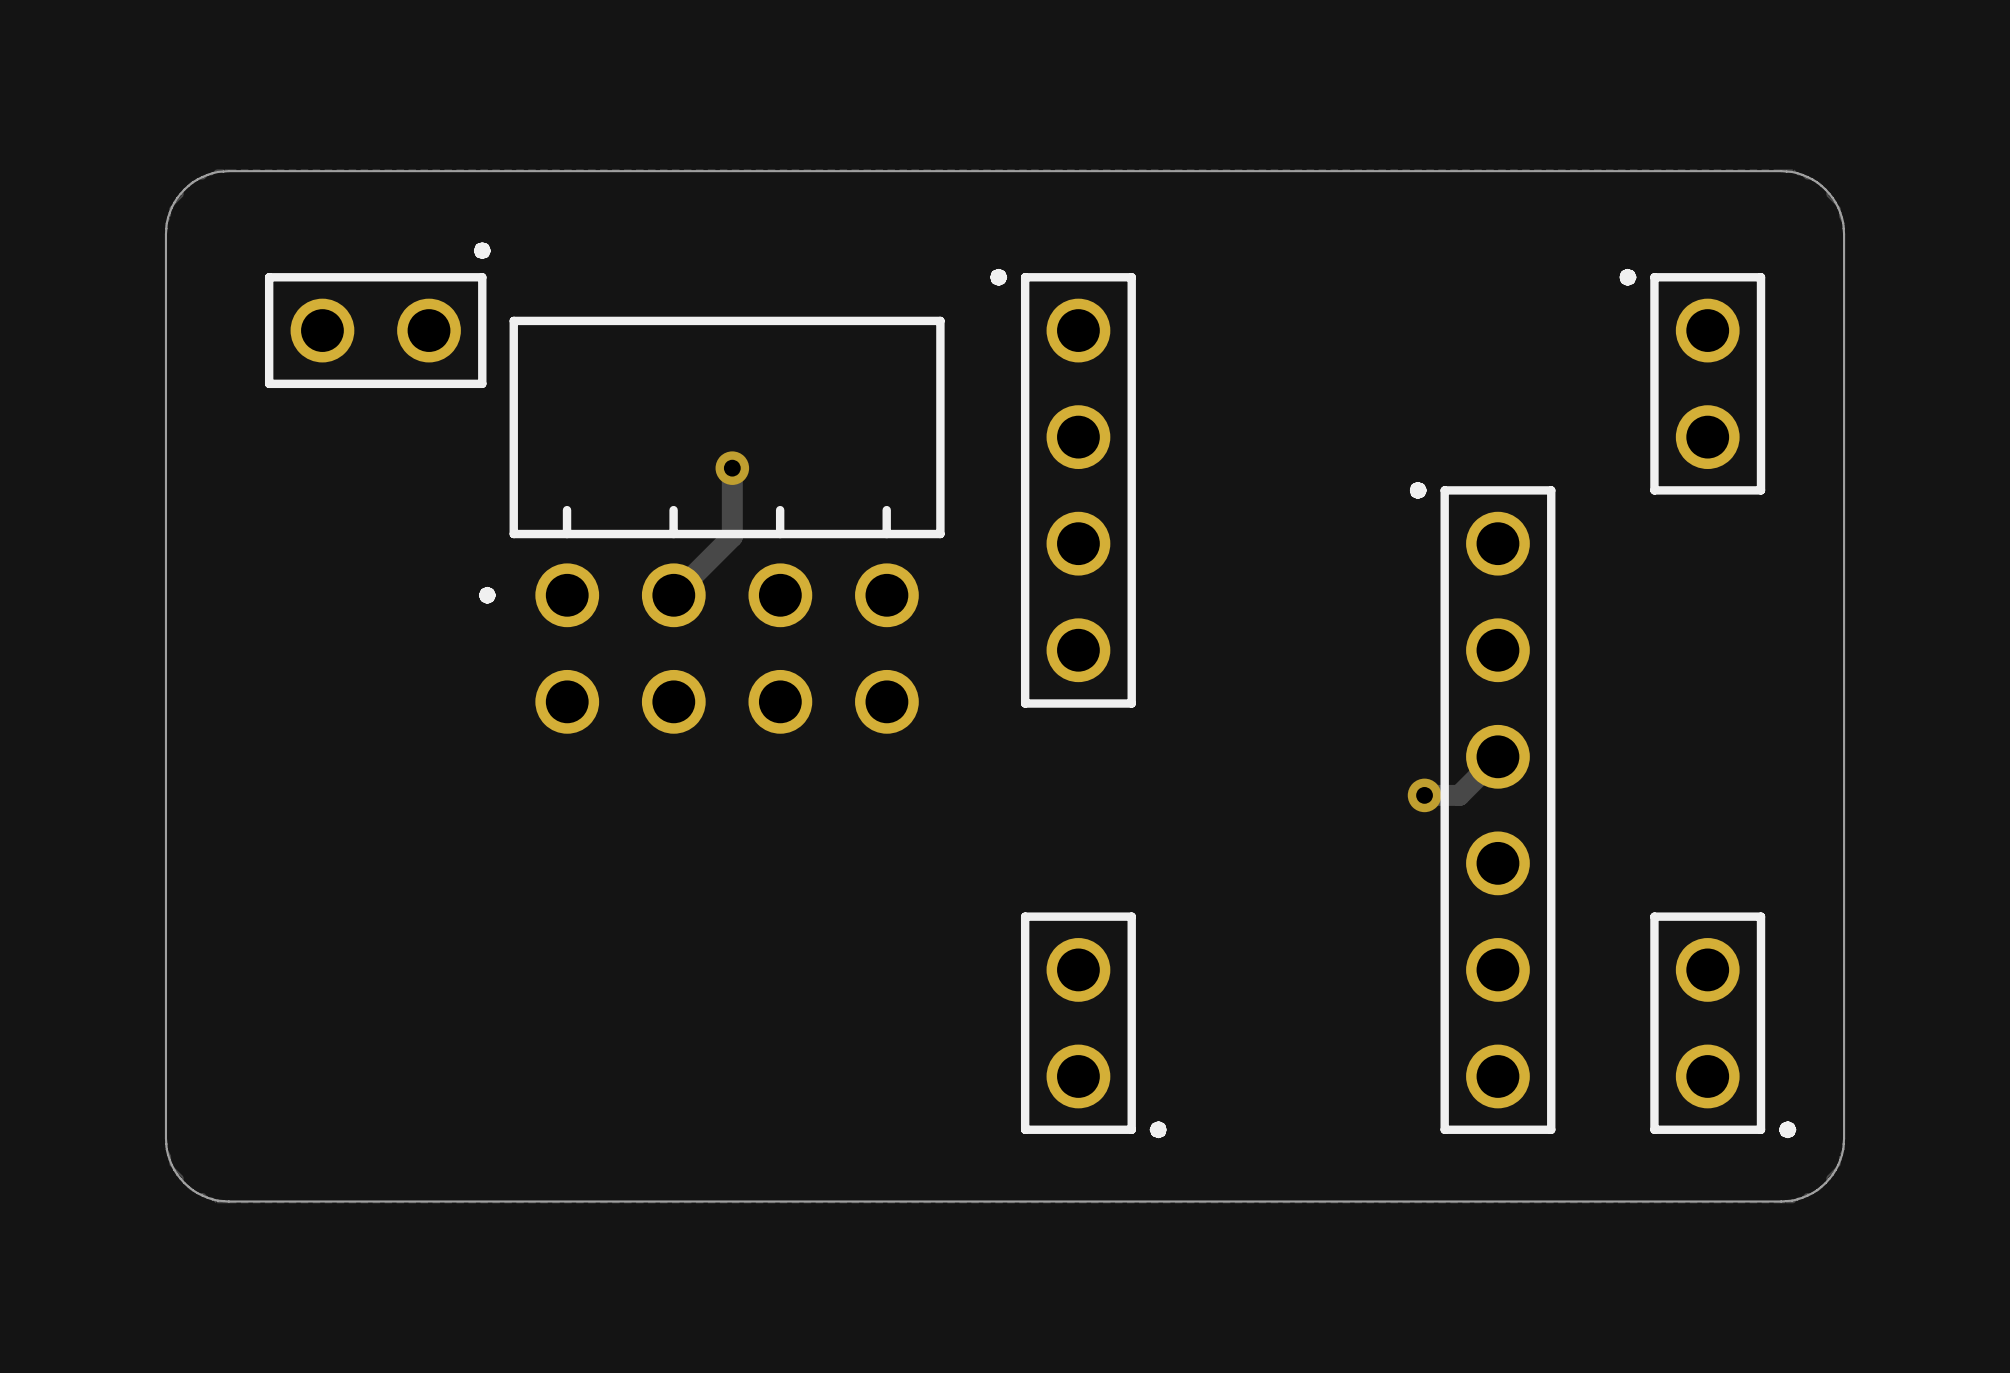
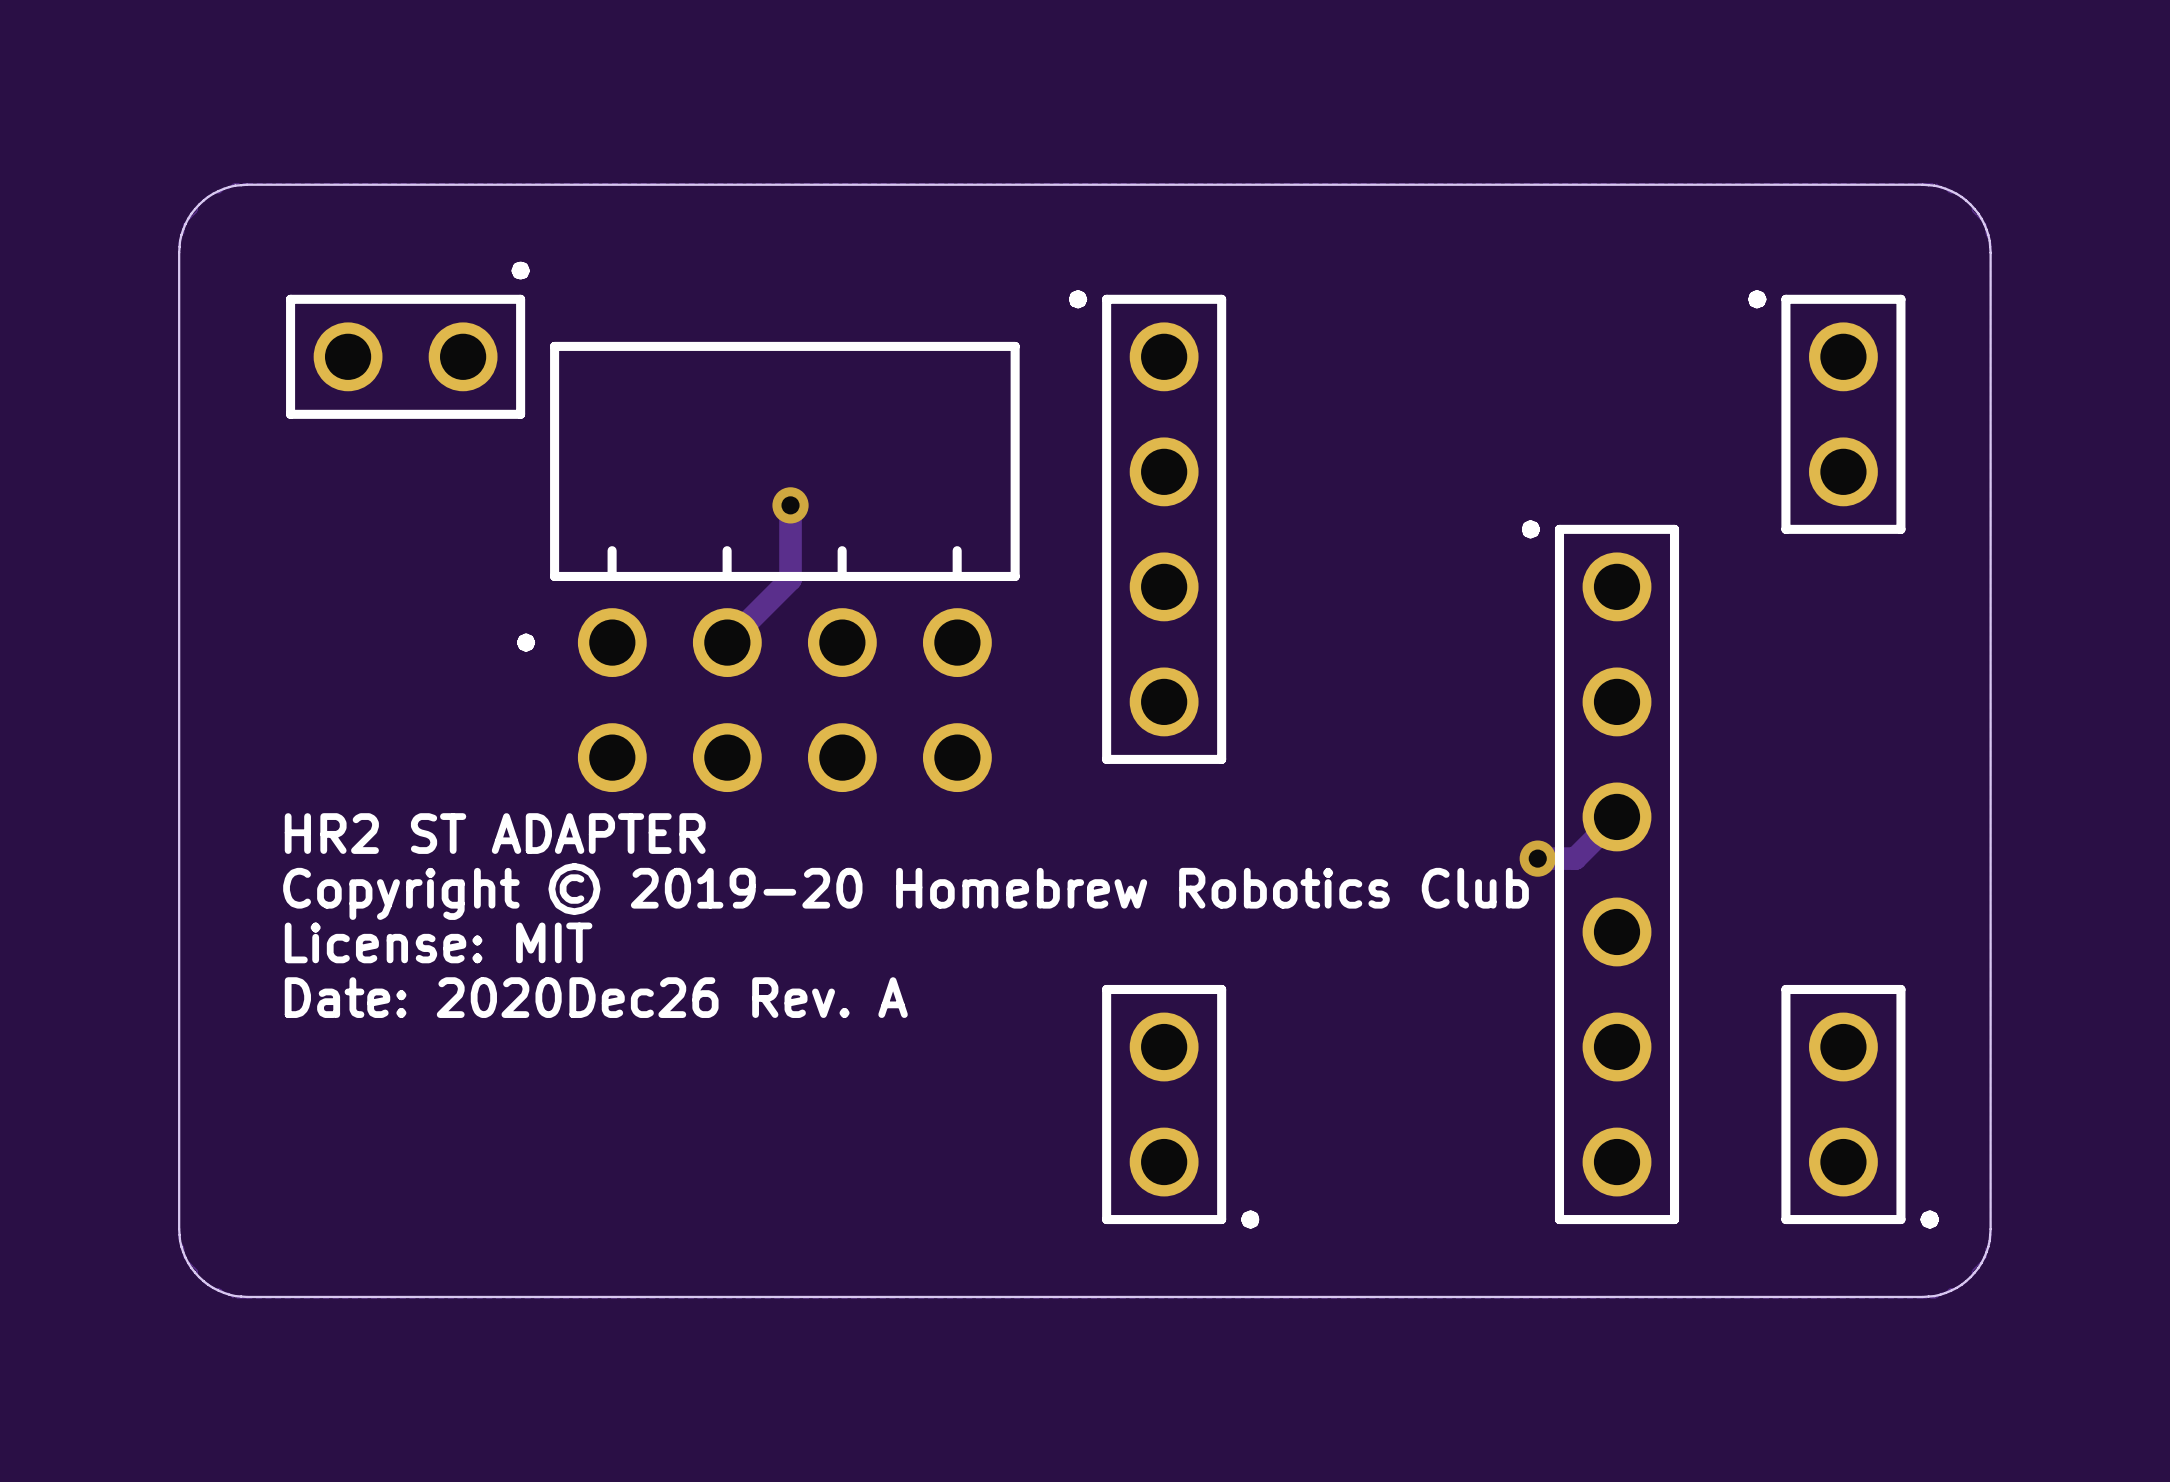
text: none -> HR2 ST ADAPTER (495, 833)
text: none -> Copyright © 2019-20 Homebrew Robotics Club (906, 891)
text: none -> License: MIT (438, 942)
text: none -> Date: 2020Dec26 Rev. A (596, 997)

